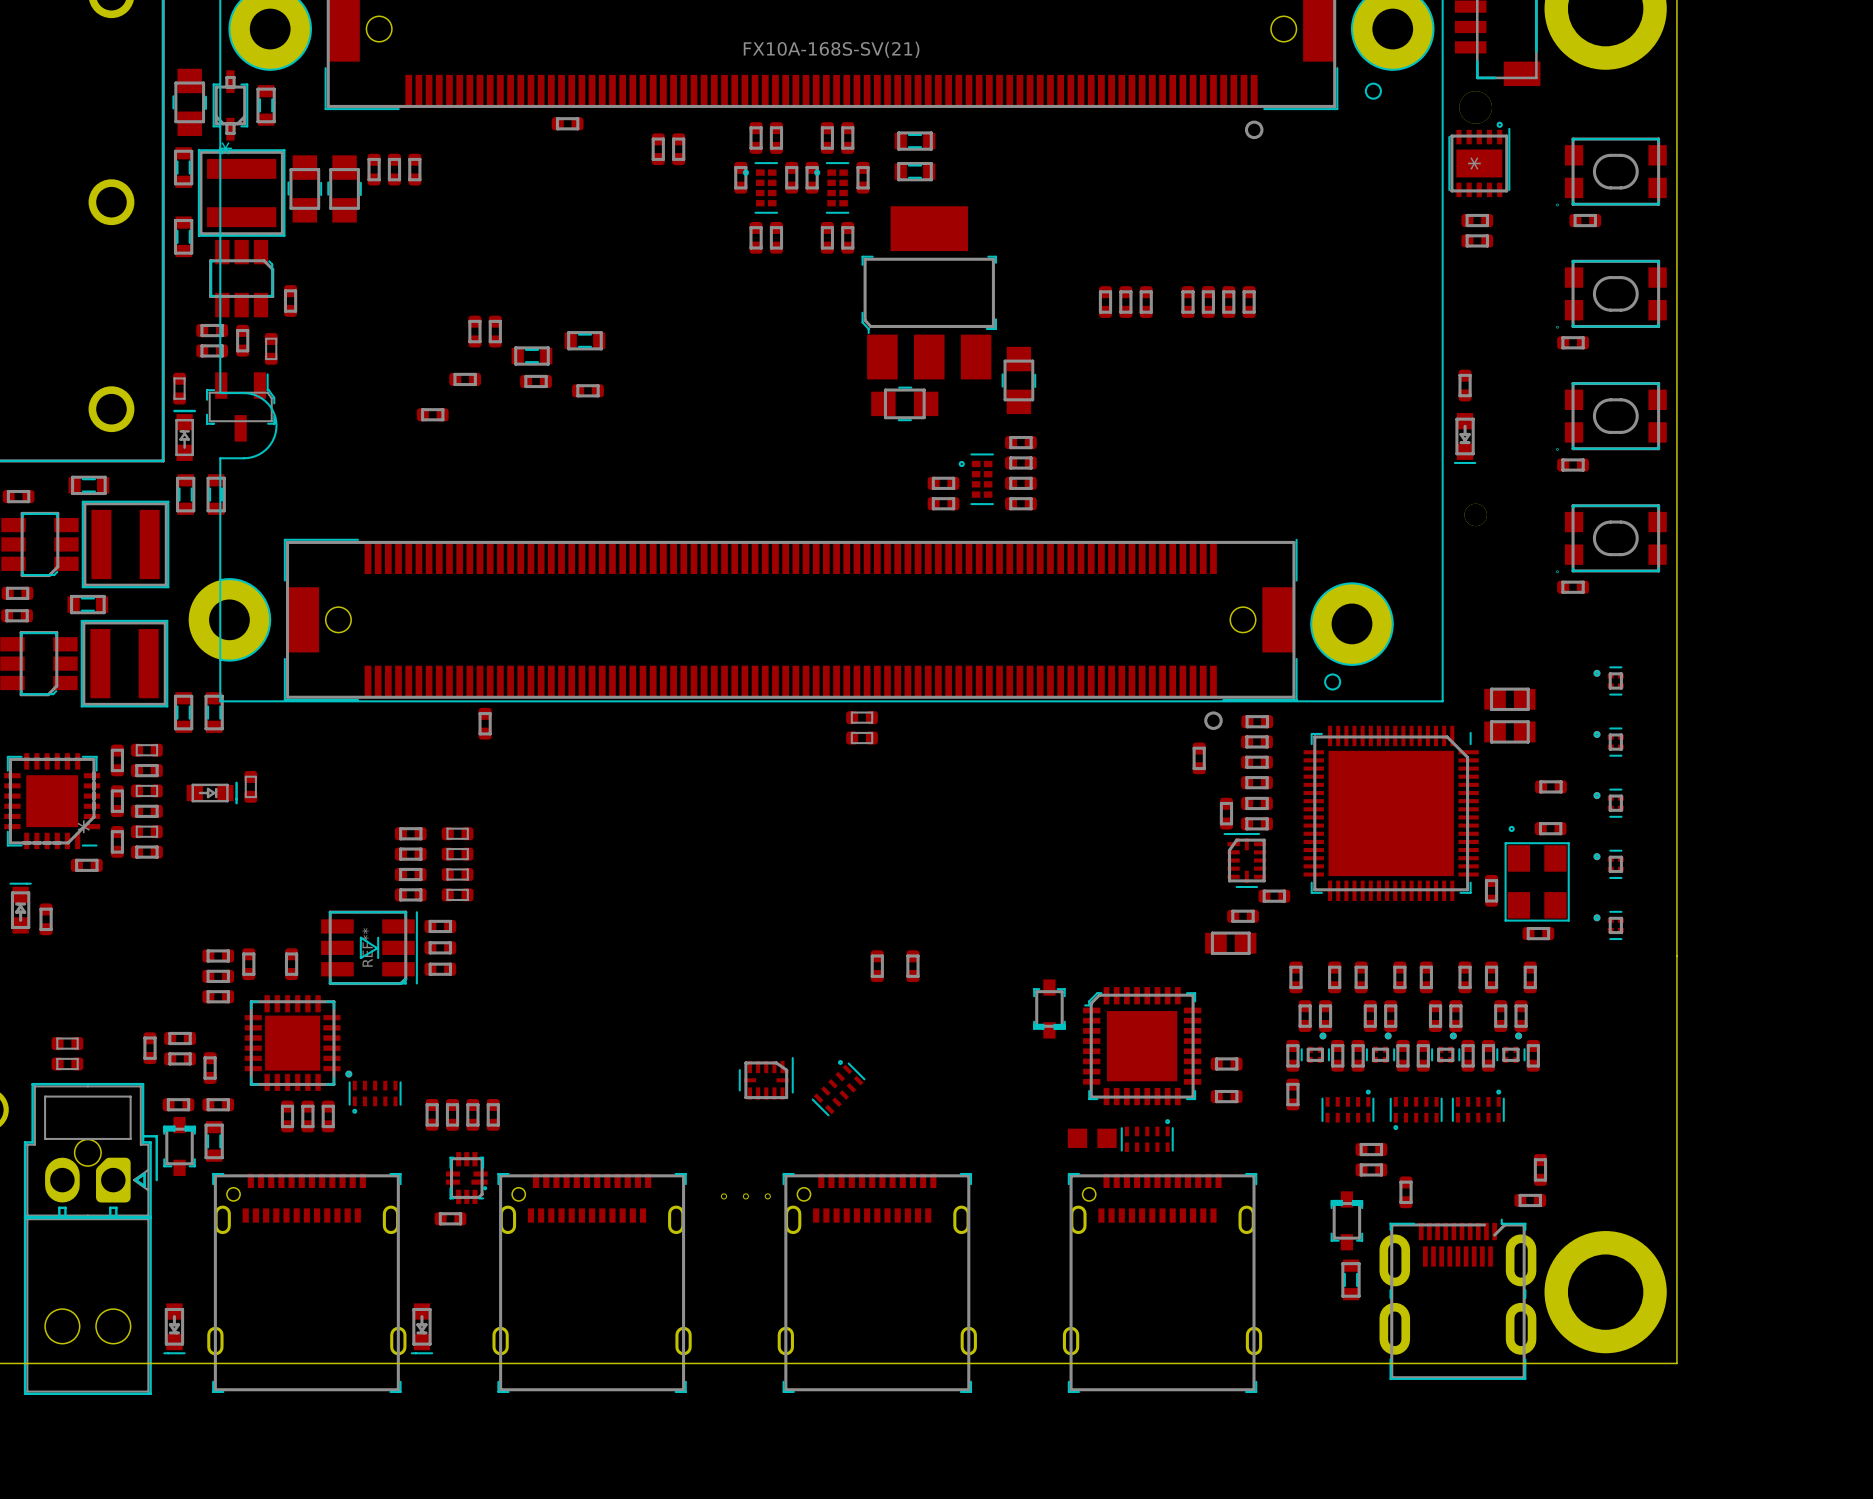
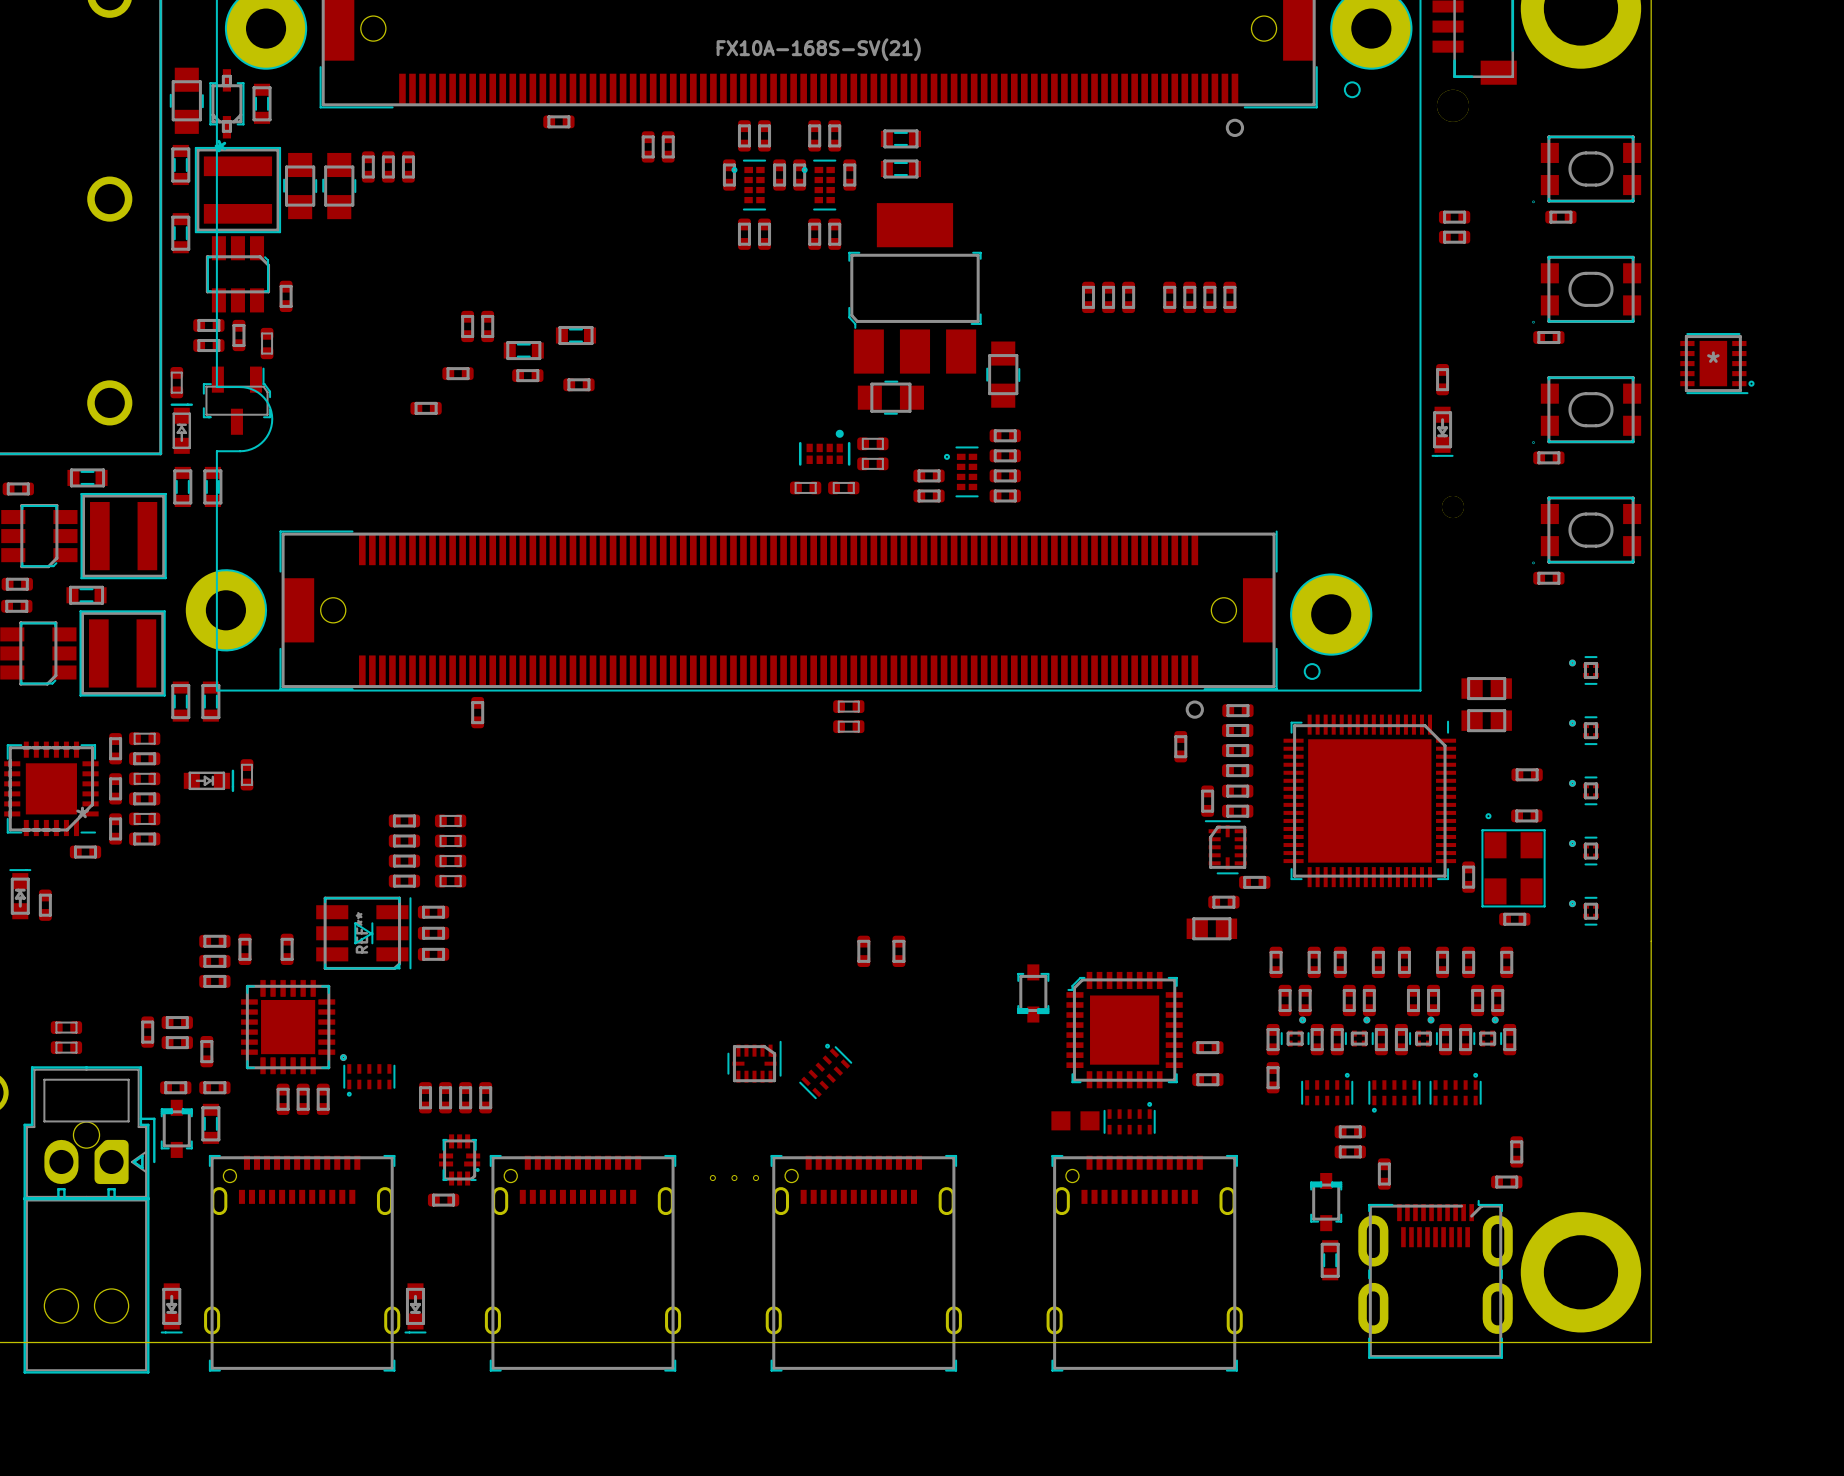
part rotation: 0° (1479, 159) -> 90° clockwise (1717, 363)
part position: (1479, 159) -> (1717, 363)
part: none -> (872, 443)
part: none -> (824, 447)
part: none -> (872, 463)
part: none -> (805, 487)
part: none -> (843, 487)

